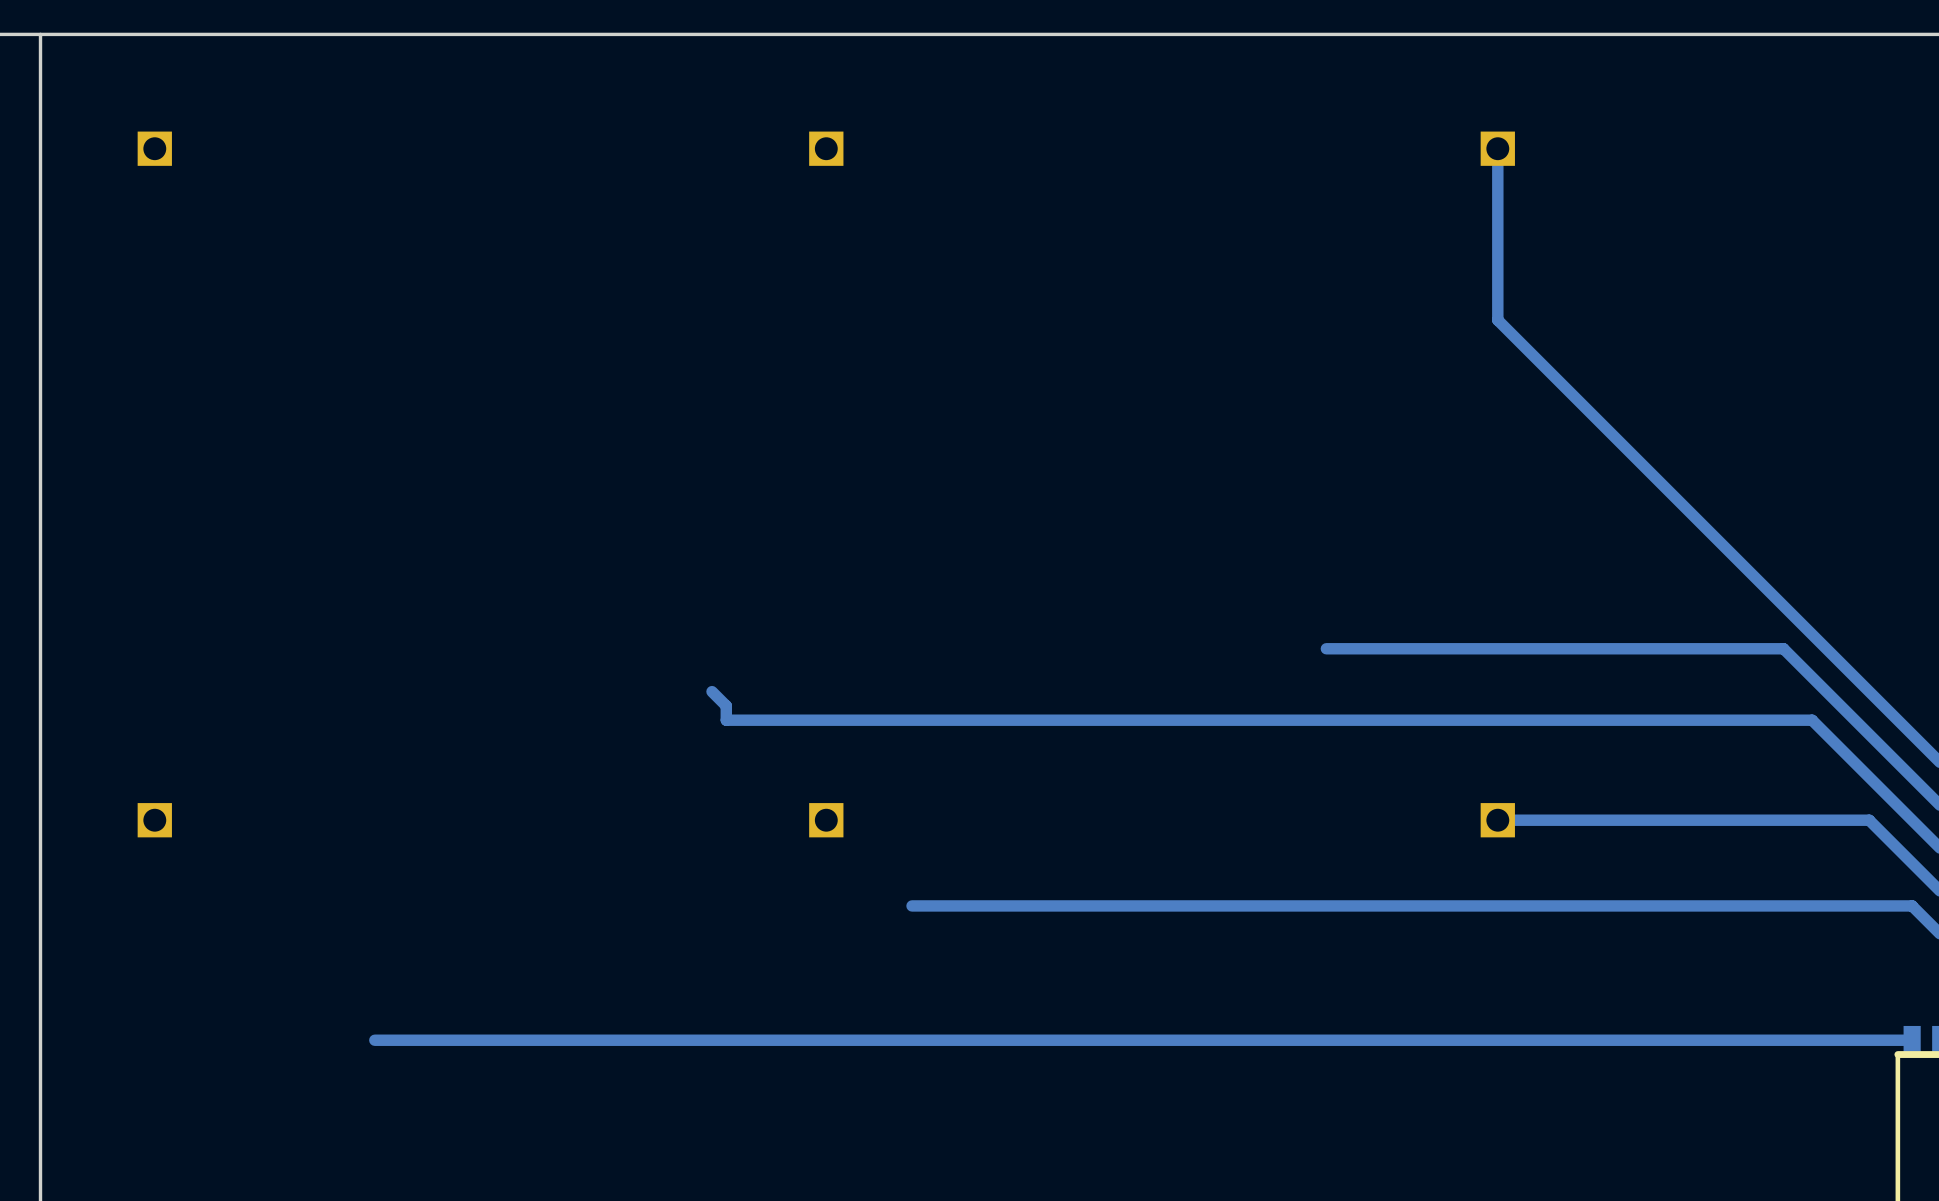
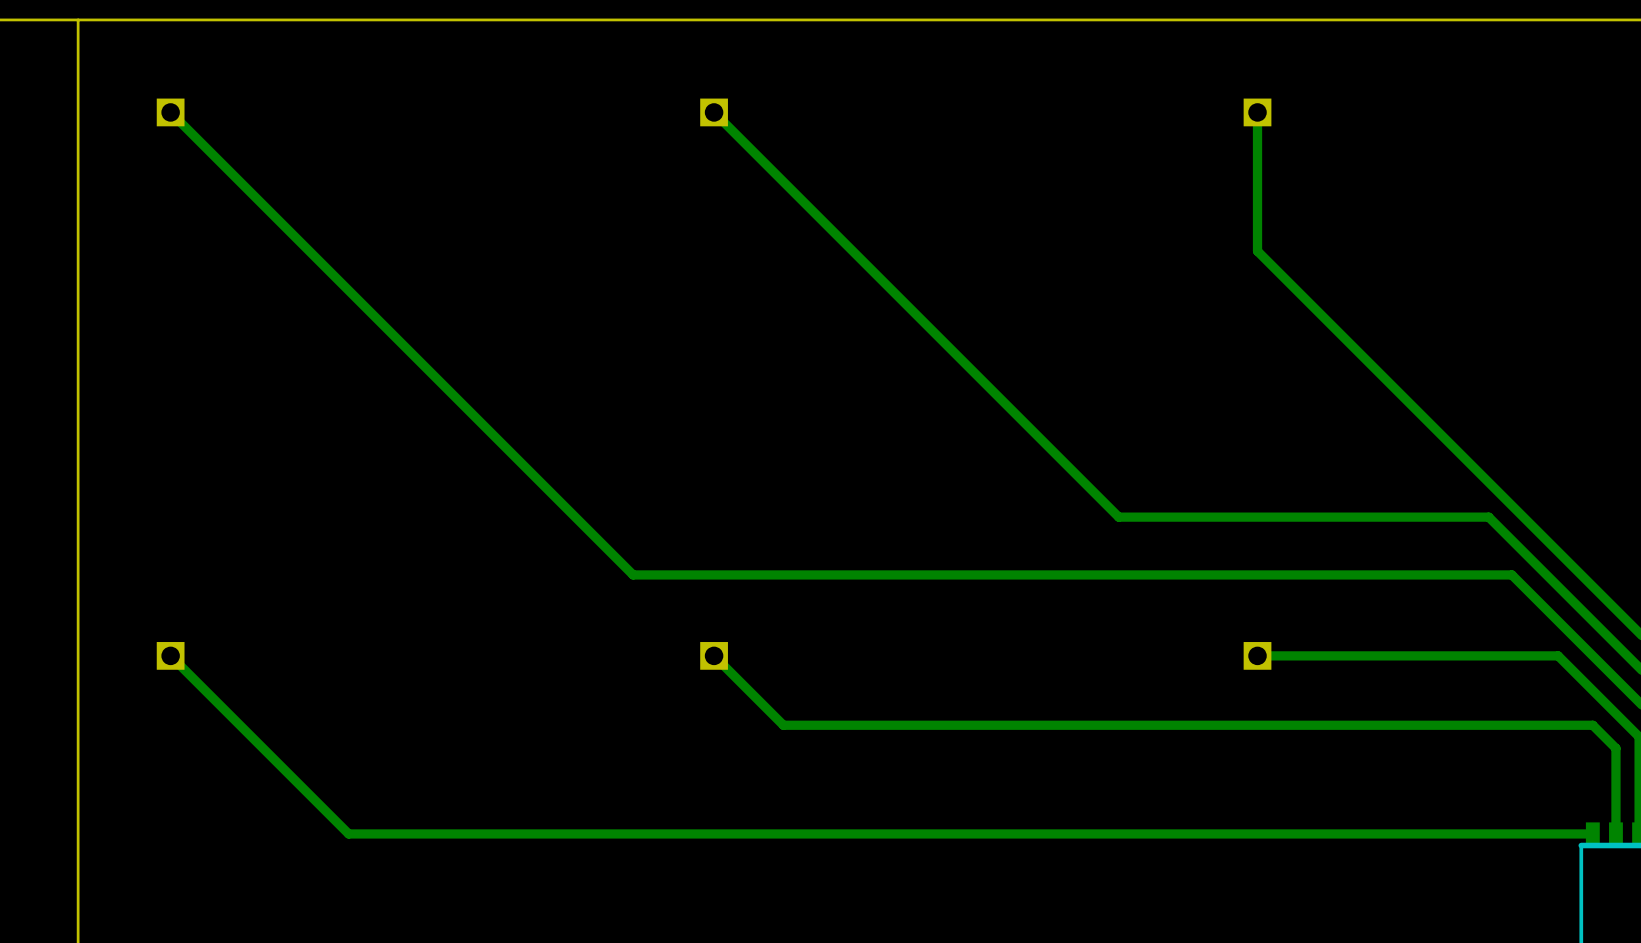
track: none -> (714, 112) (1118, 517)
track: (712, 691) (726, 705) (726, 720) -> (170, 112) (633, 574)
track: none -> (170, 655) (348, 833)
track: none -> (714, 655) (783, 725)

